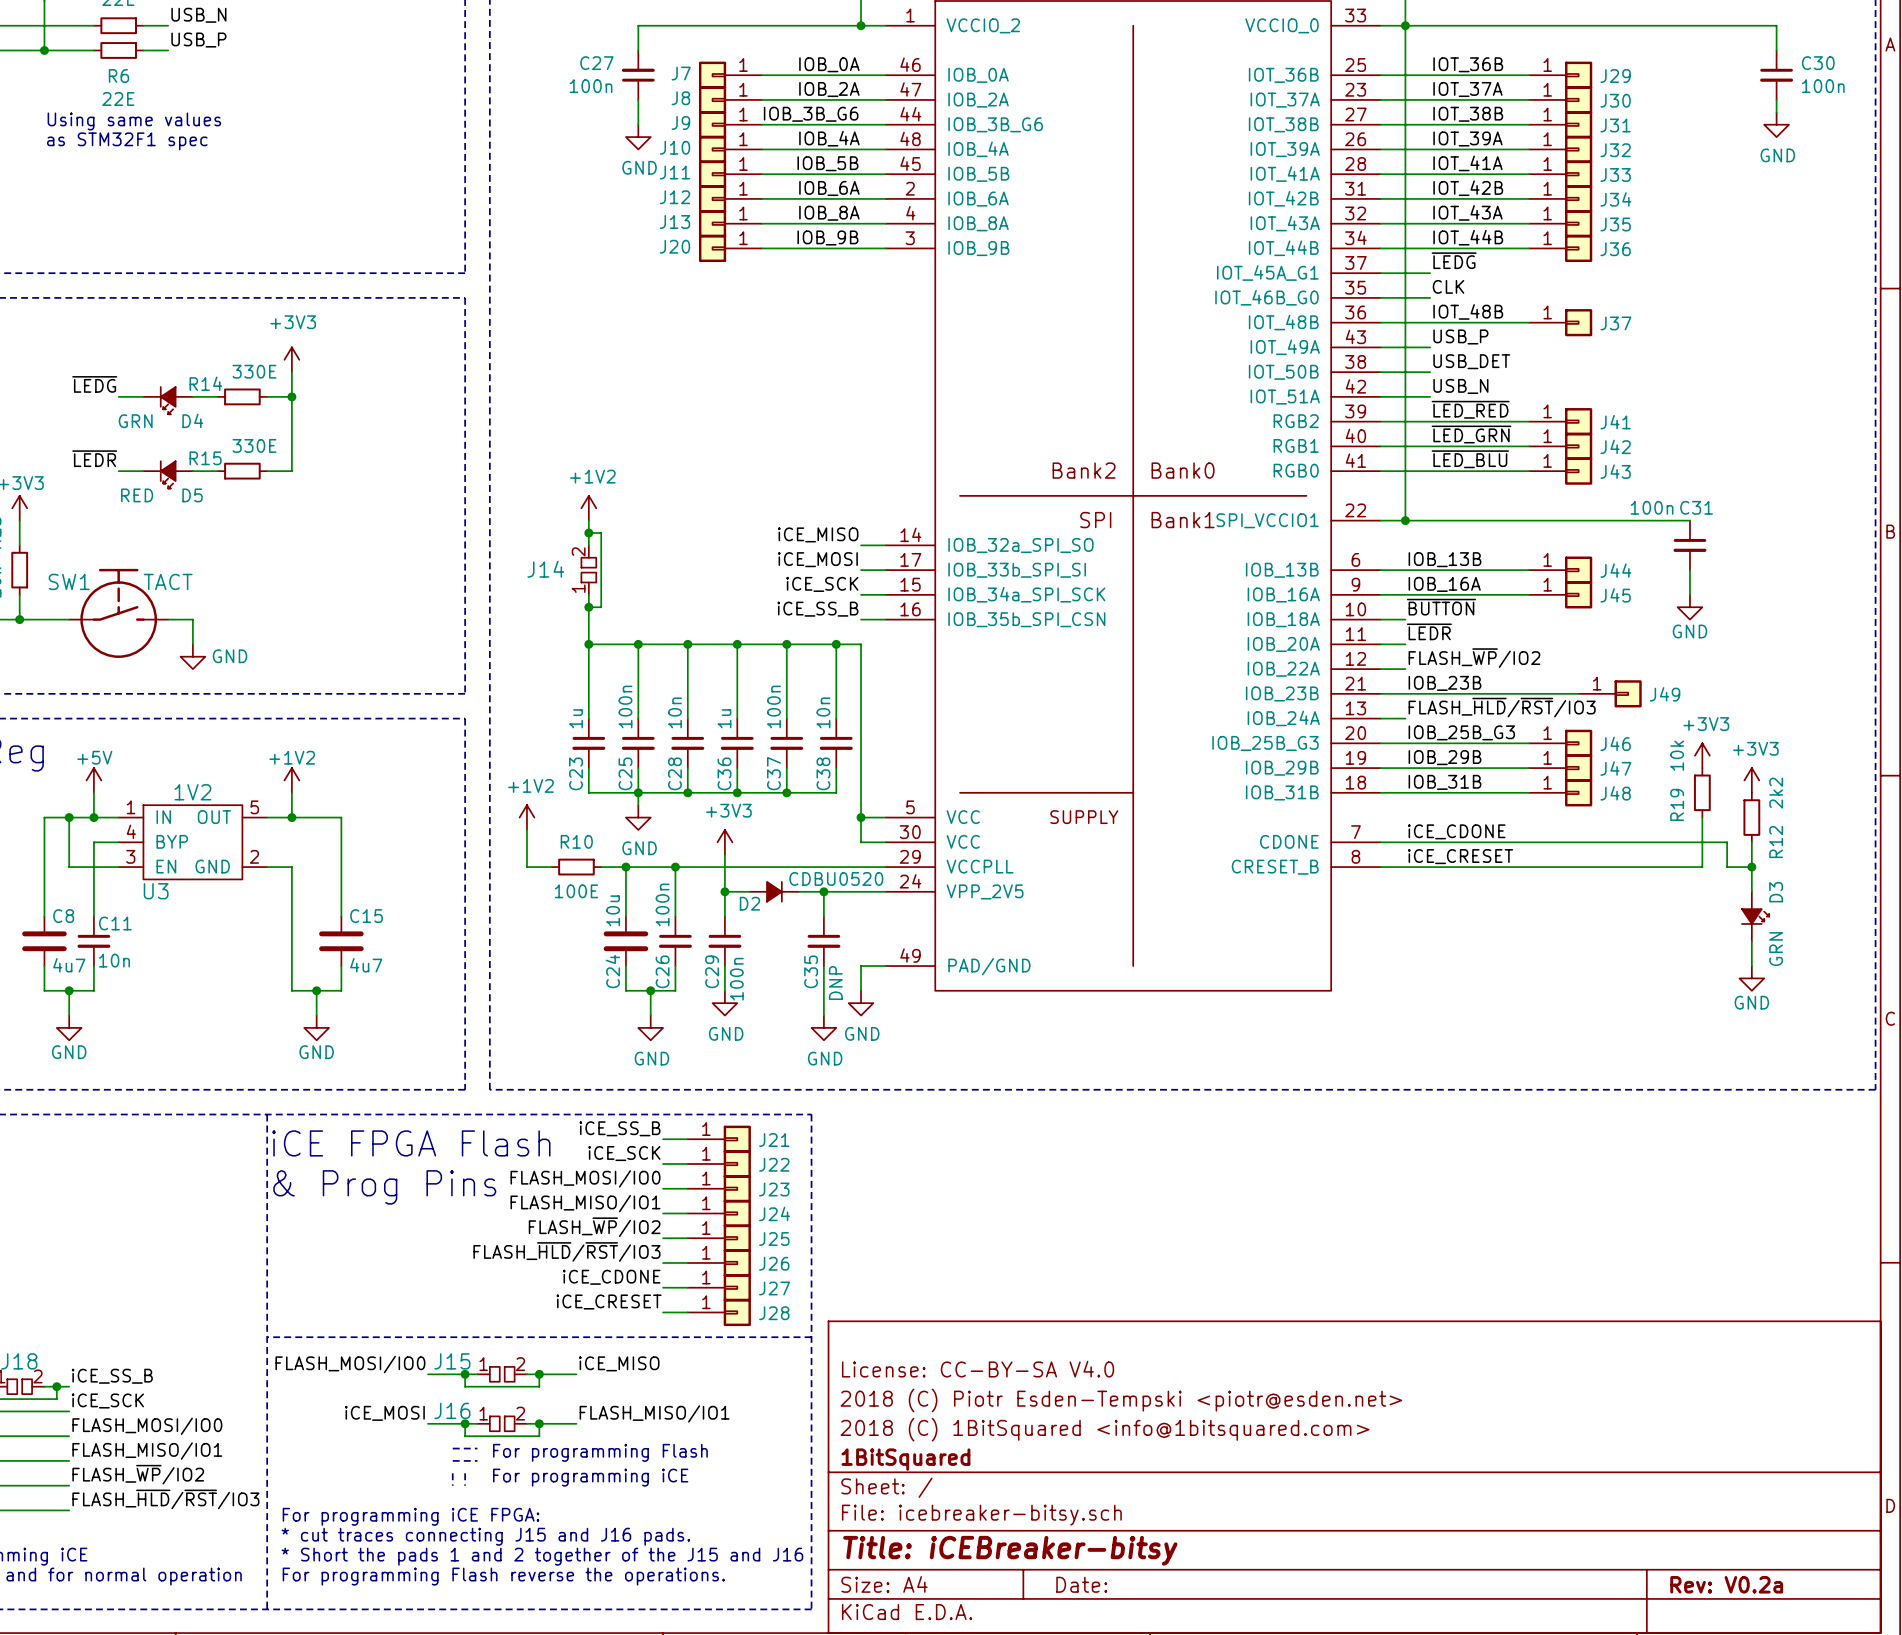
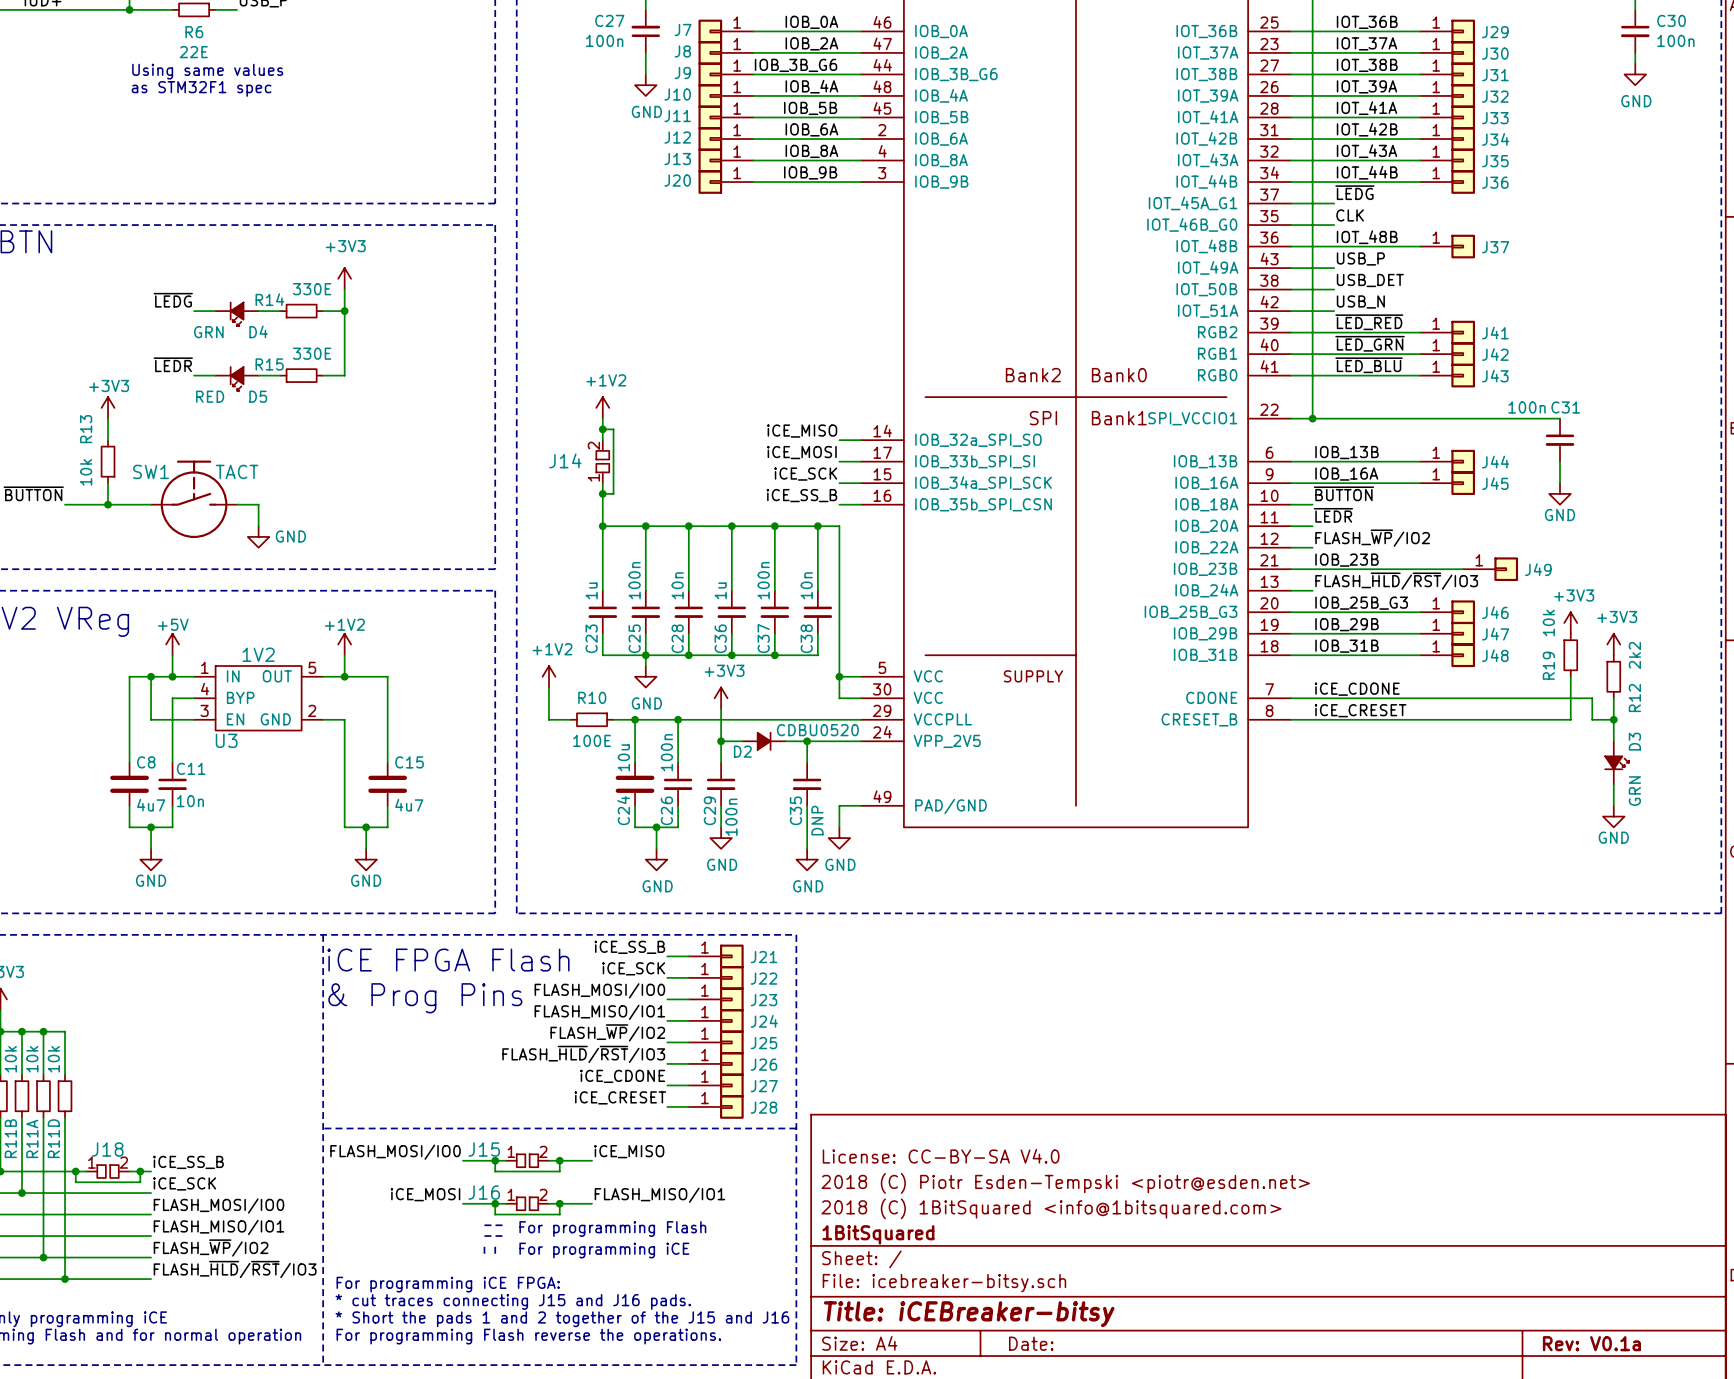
title block: Rev: V0.2a (1726, 1584) -> Rev: V0.1a (1591, 1343)

